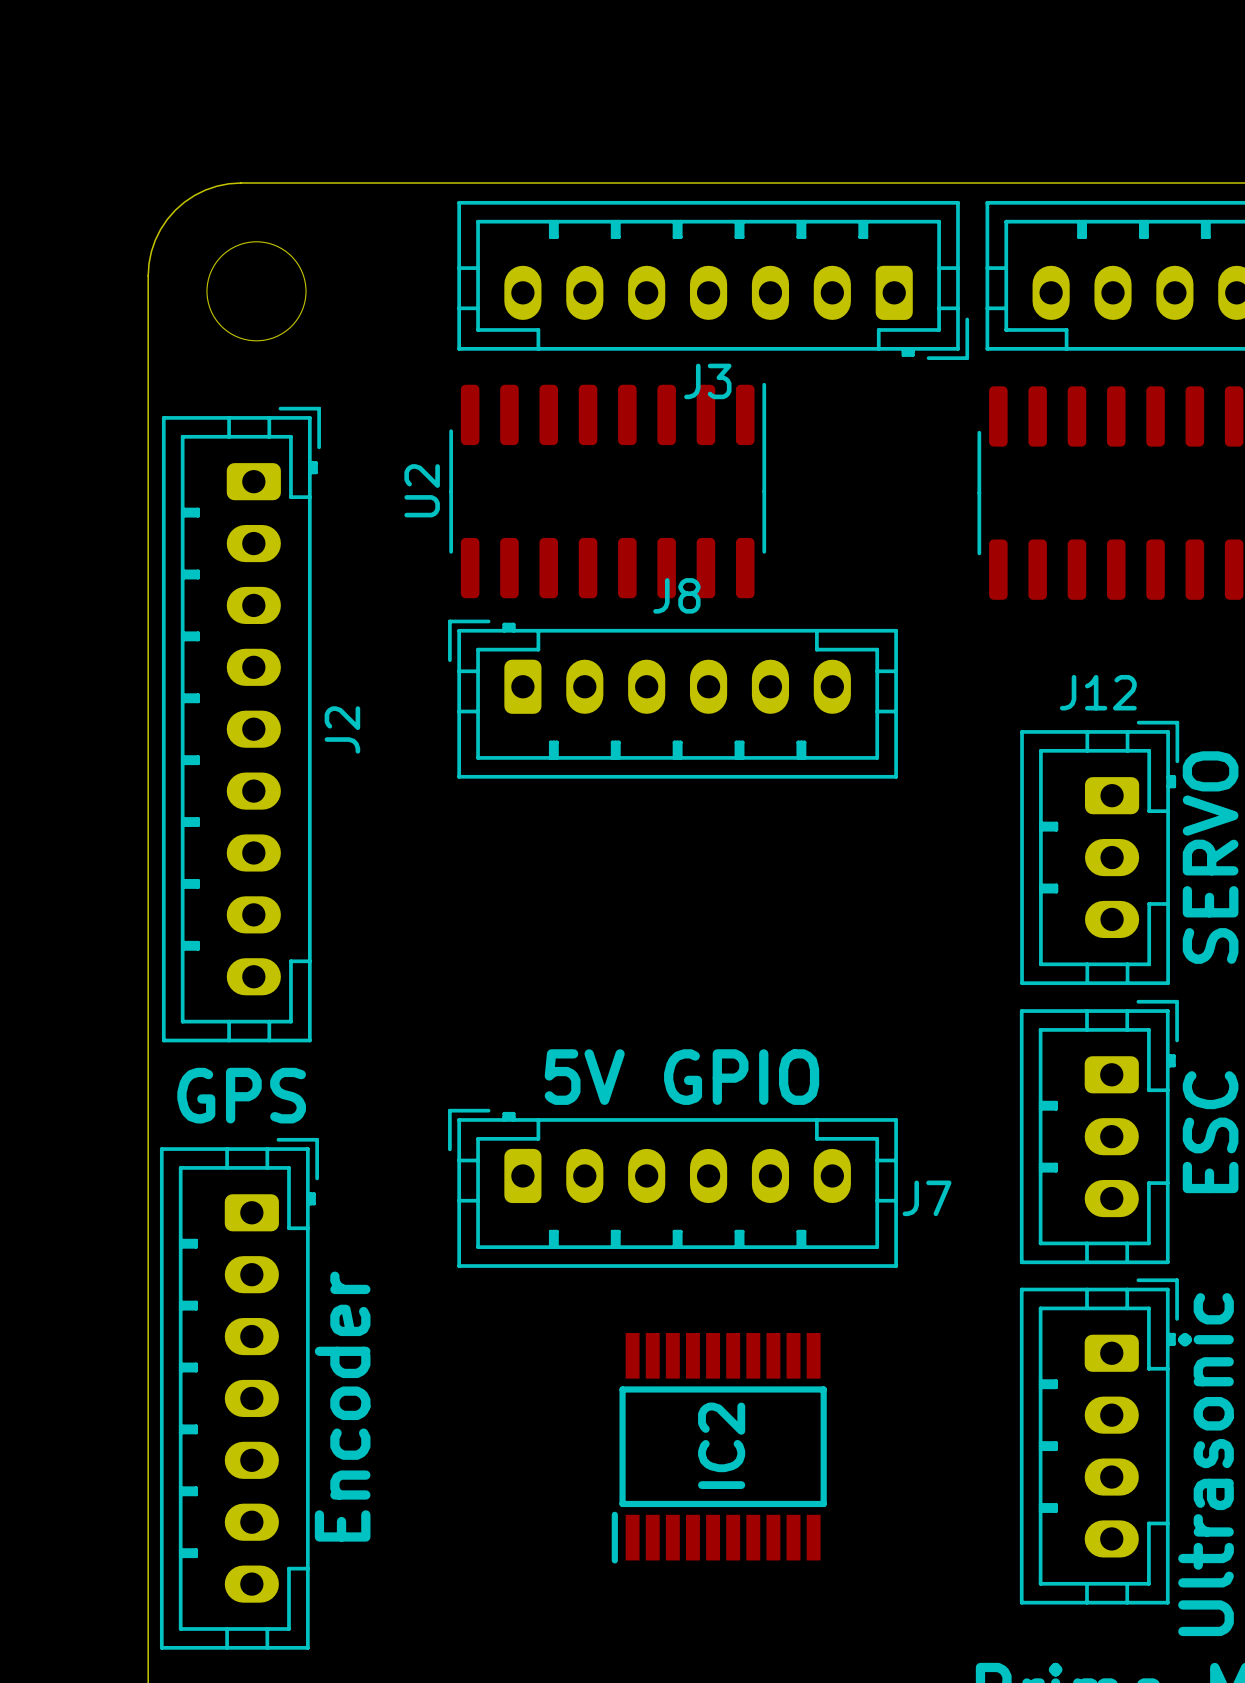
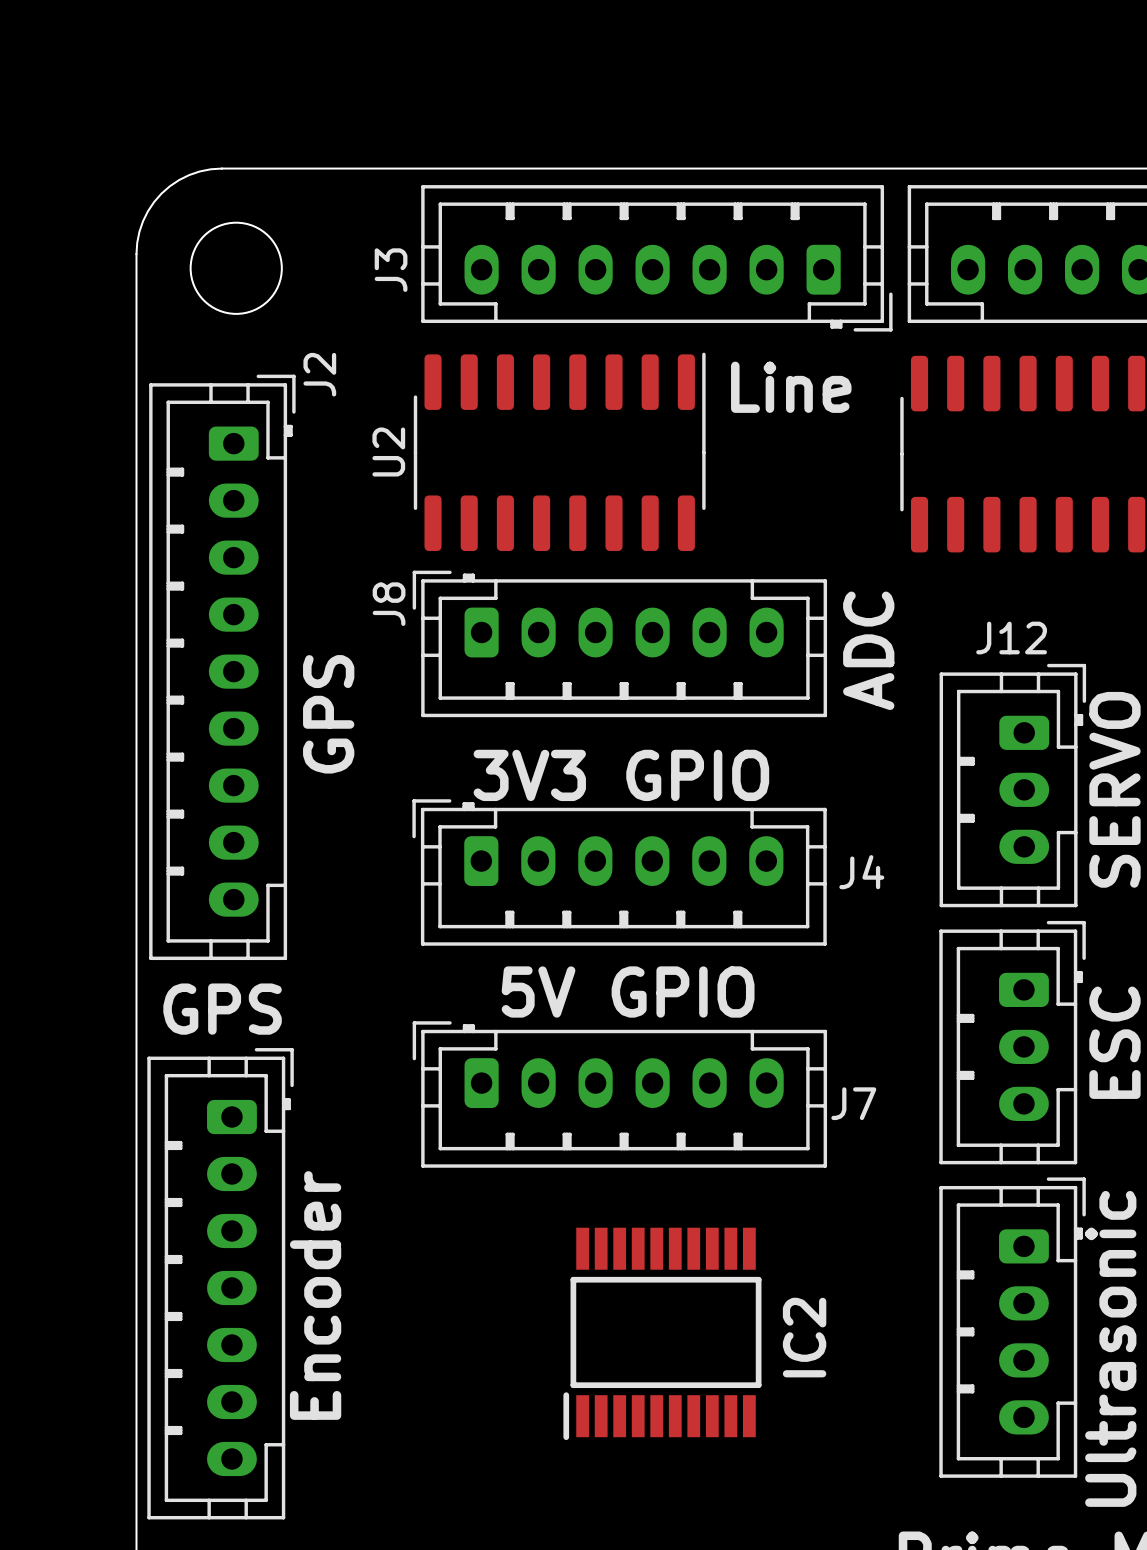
J3 name rotation: 0° (707, 381) -> 90° counterclockwise (391, 270)
J3 name position: J3 (707, 381) -> J3 (391, 270)
text: none -> Line (791, 387)
J8 name rotation: 0° (676, 595) -> 90° counterclockwise (389, 604)
J8 name position: J8 (676, 595) -> J8 (389, 604)
text: none -> ADC (868, 650)
J2 name position: J2 (342, 729) -> J2 (319, 374)
text: none -> GPS (328, 714)
text: none -> 3V3 GPIO (621, 775)
J4: none -> (619, 872)
IC2 name position: IC2 (721, 1445) -> IC2 (804, 1337)

